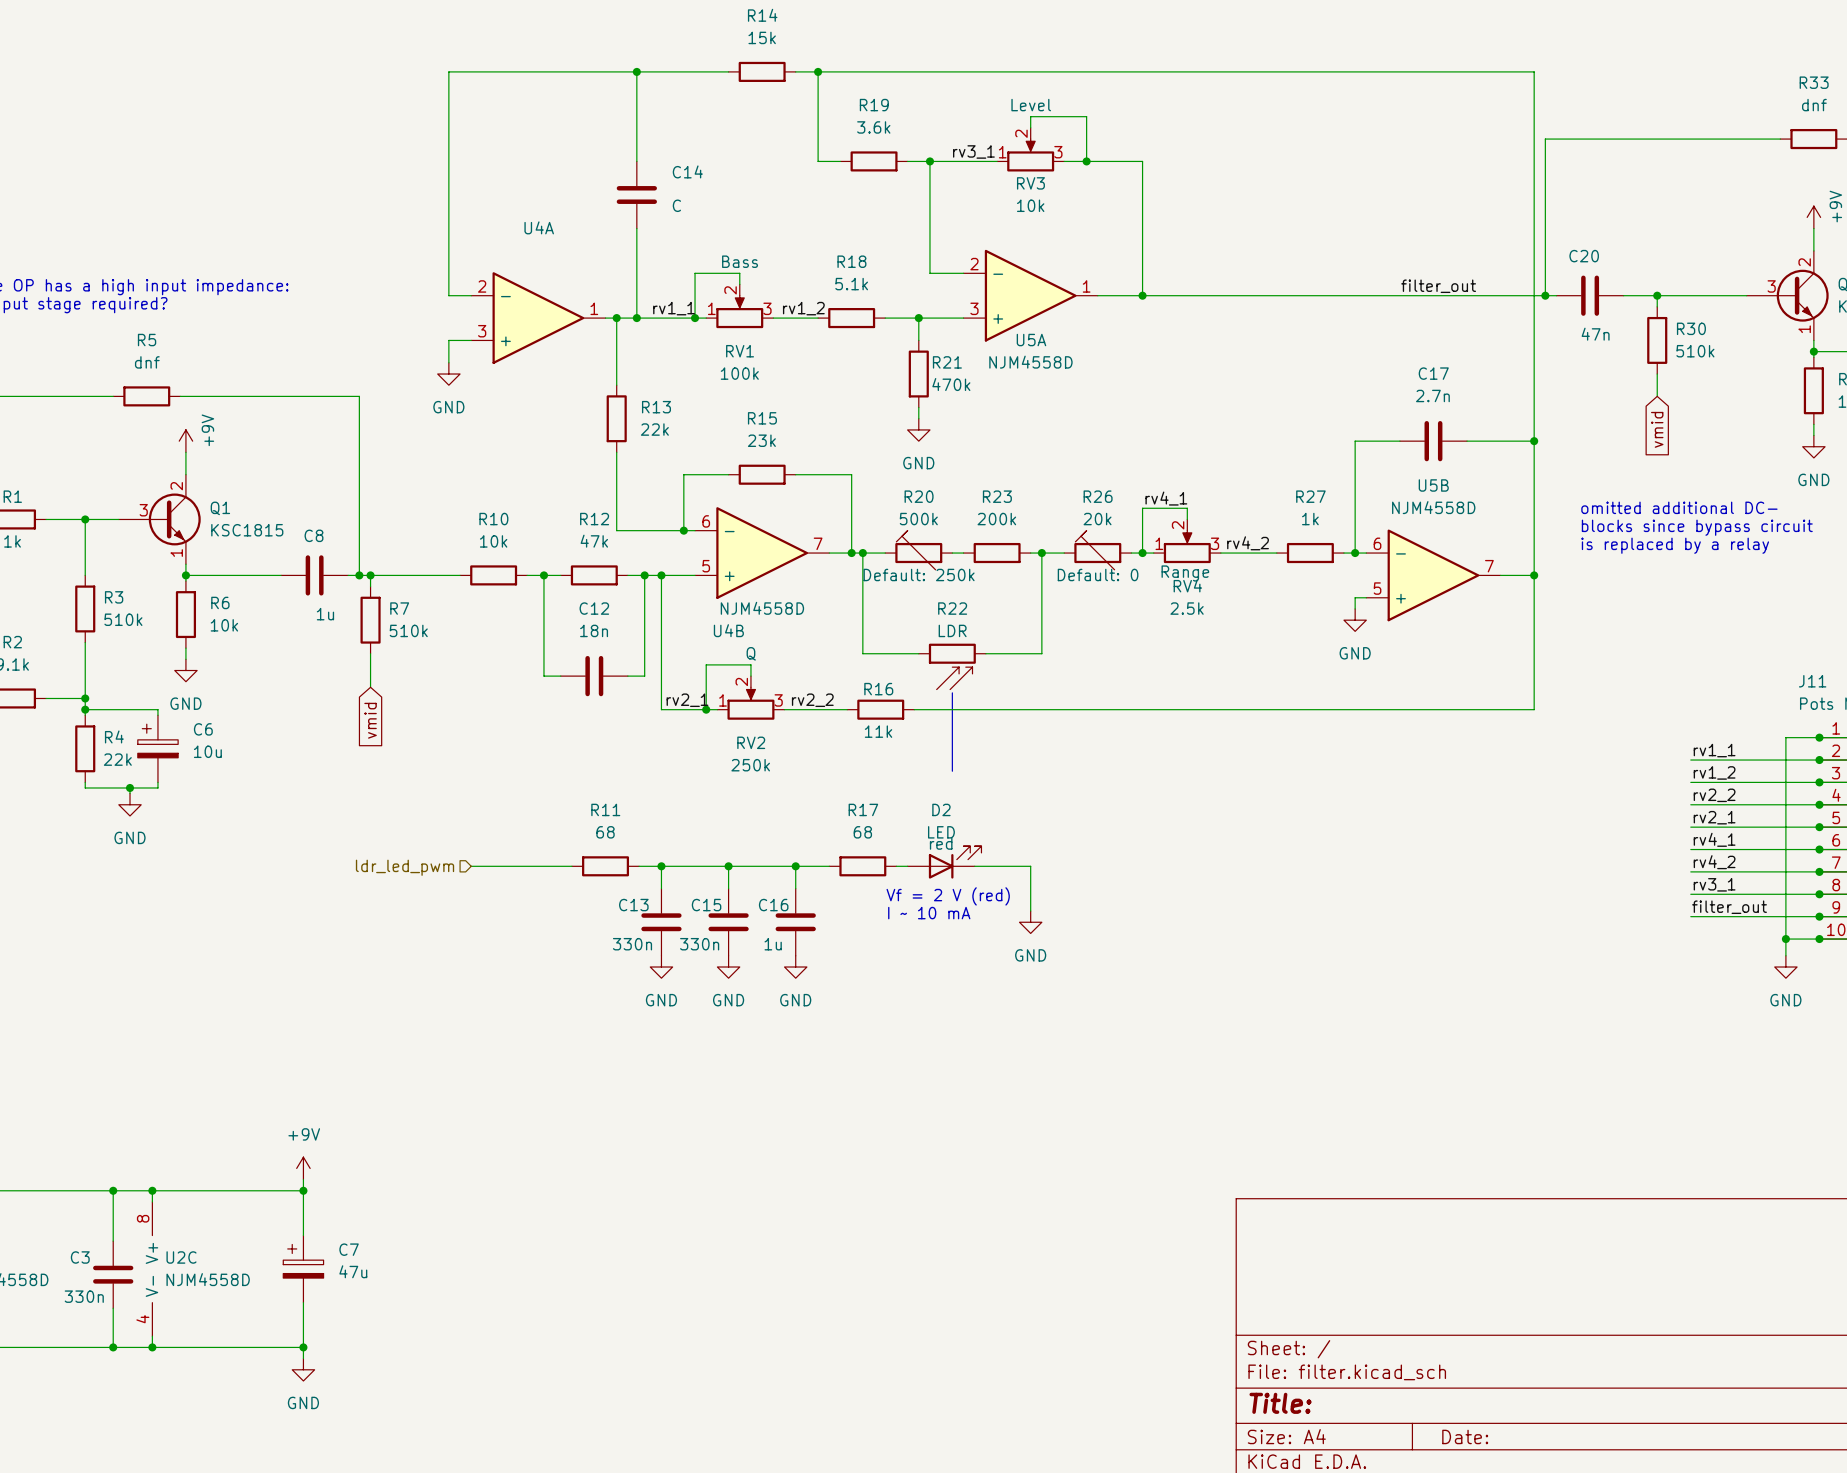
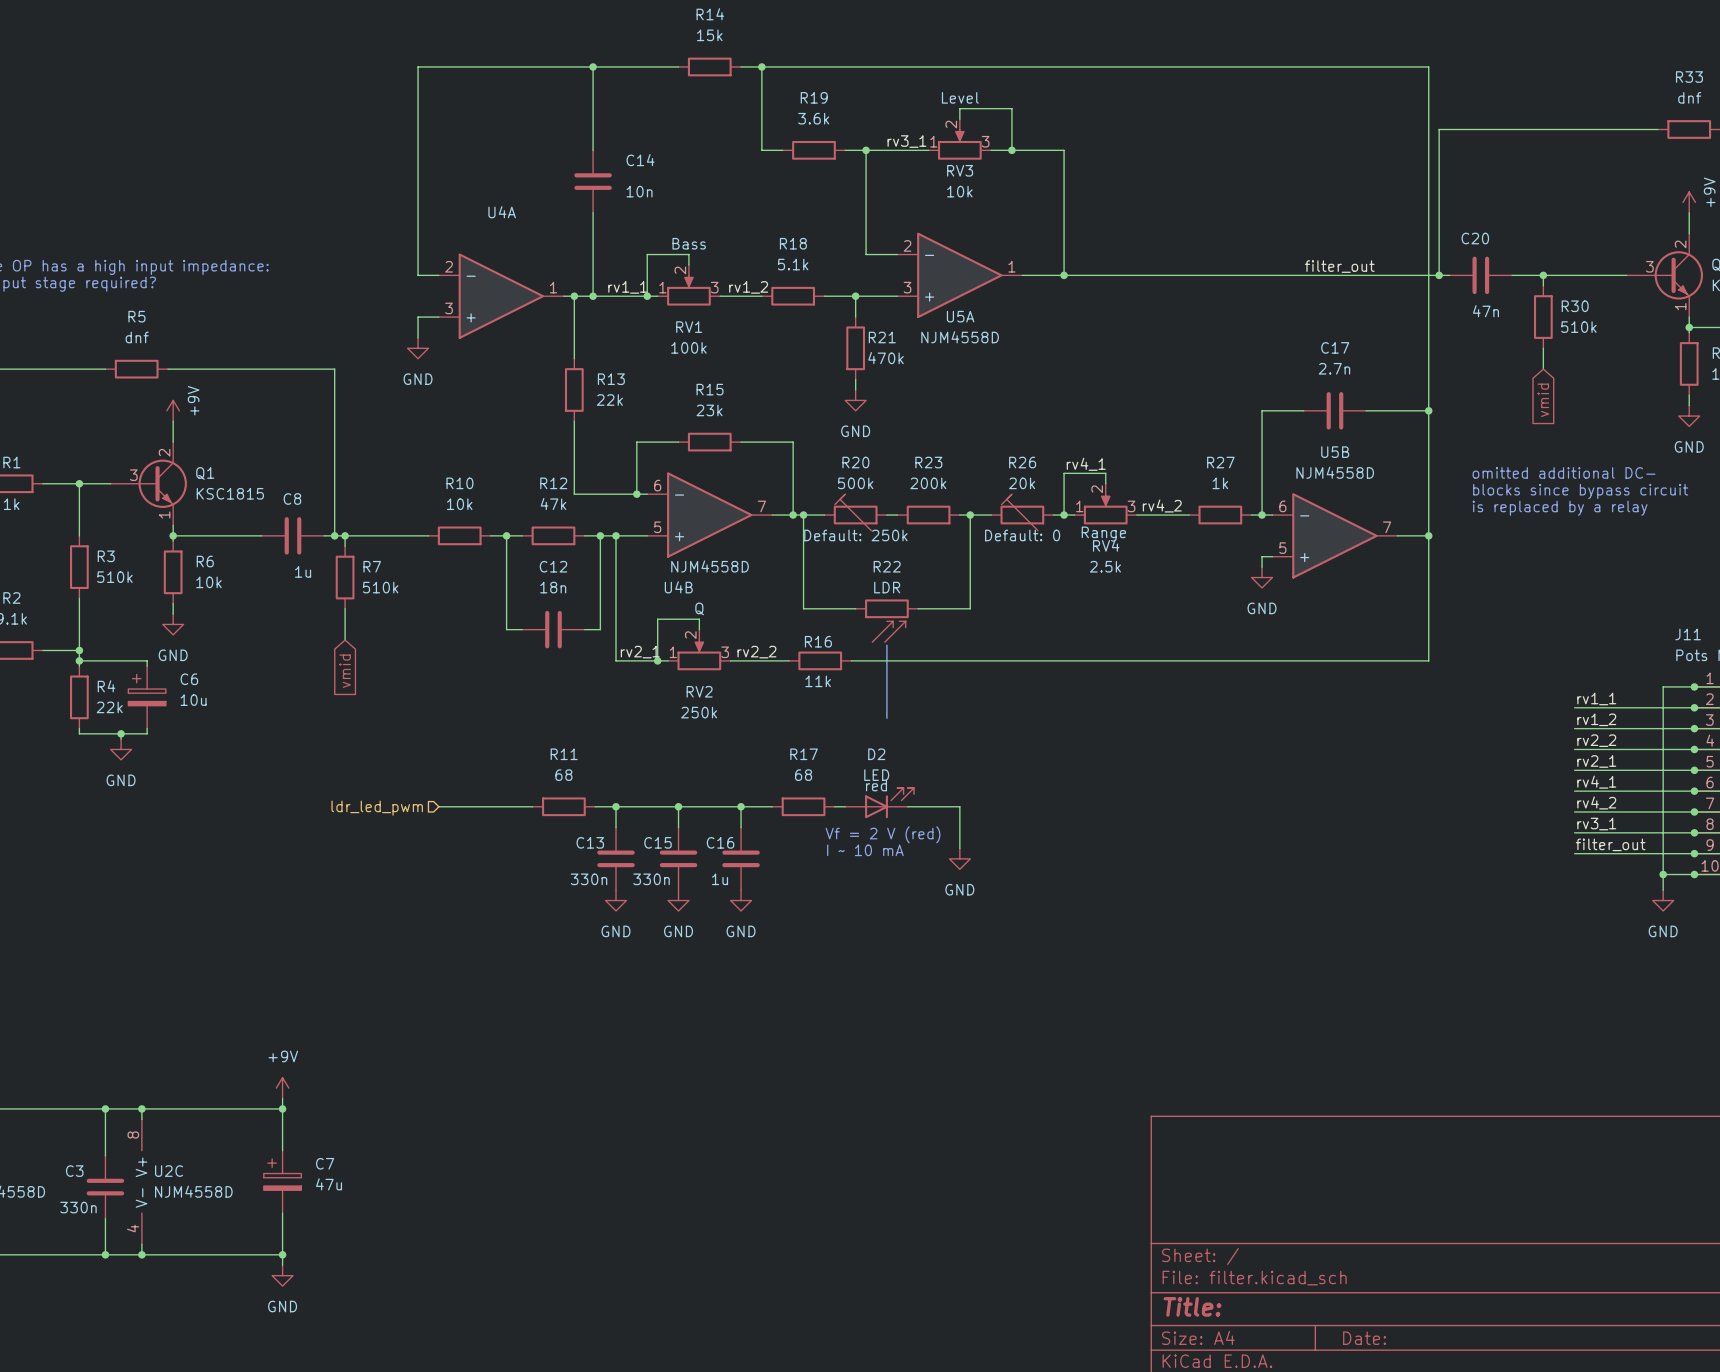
C14 value: C (676, 205) -> 10n (639, 191)

